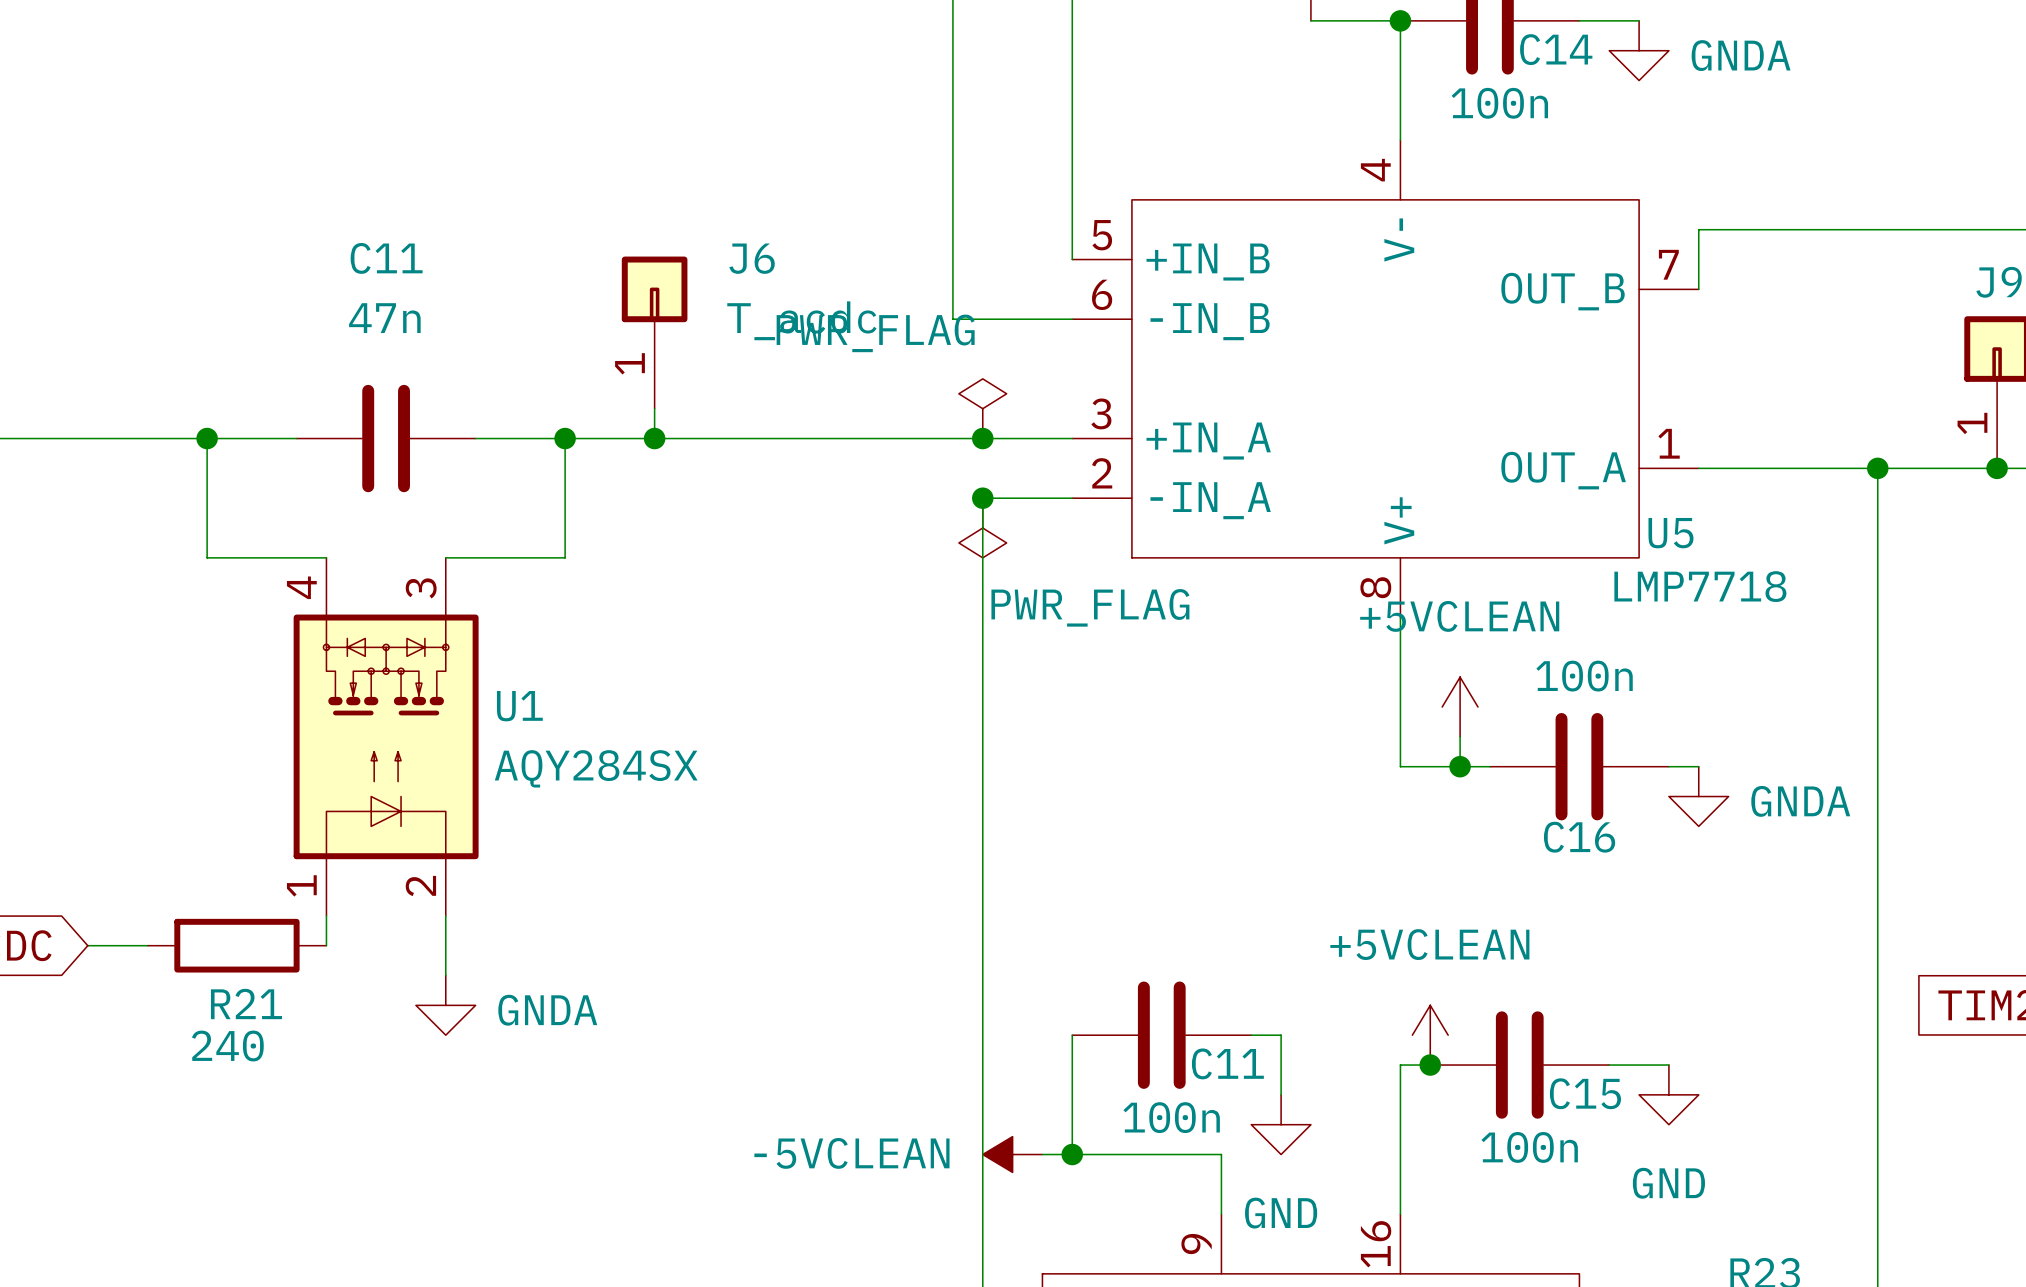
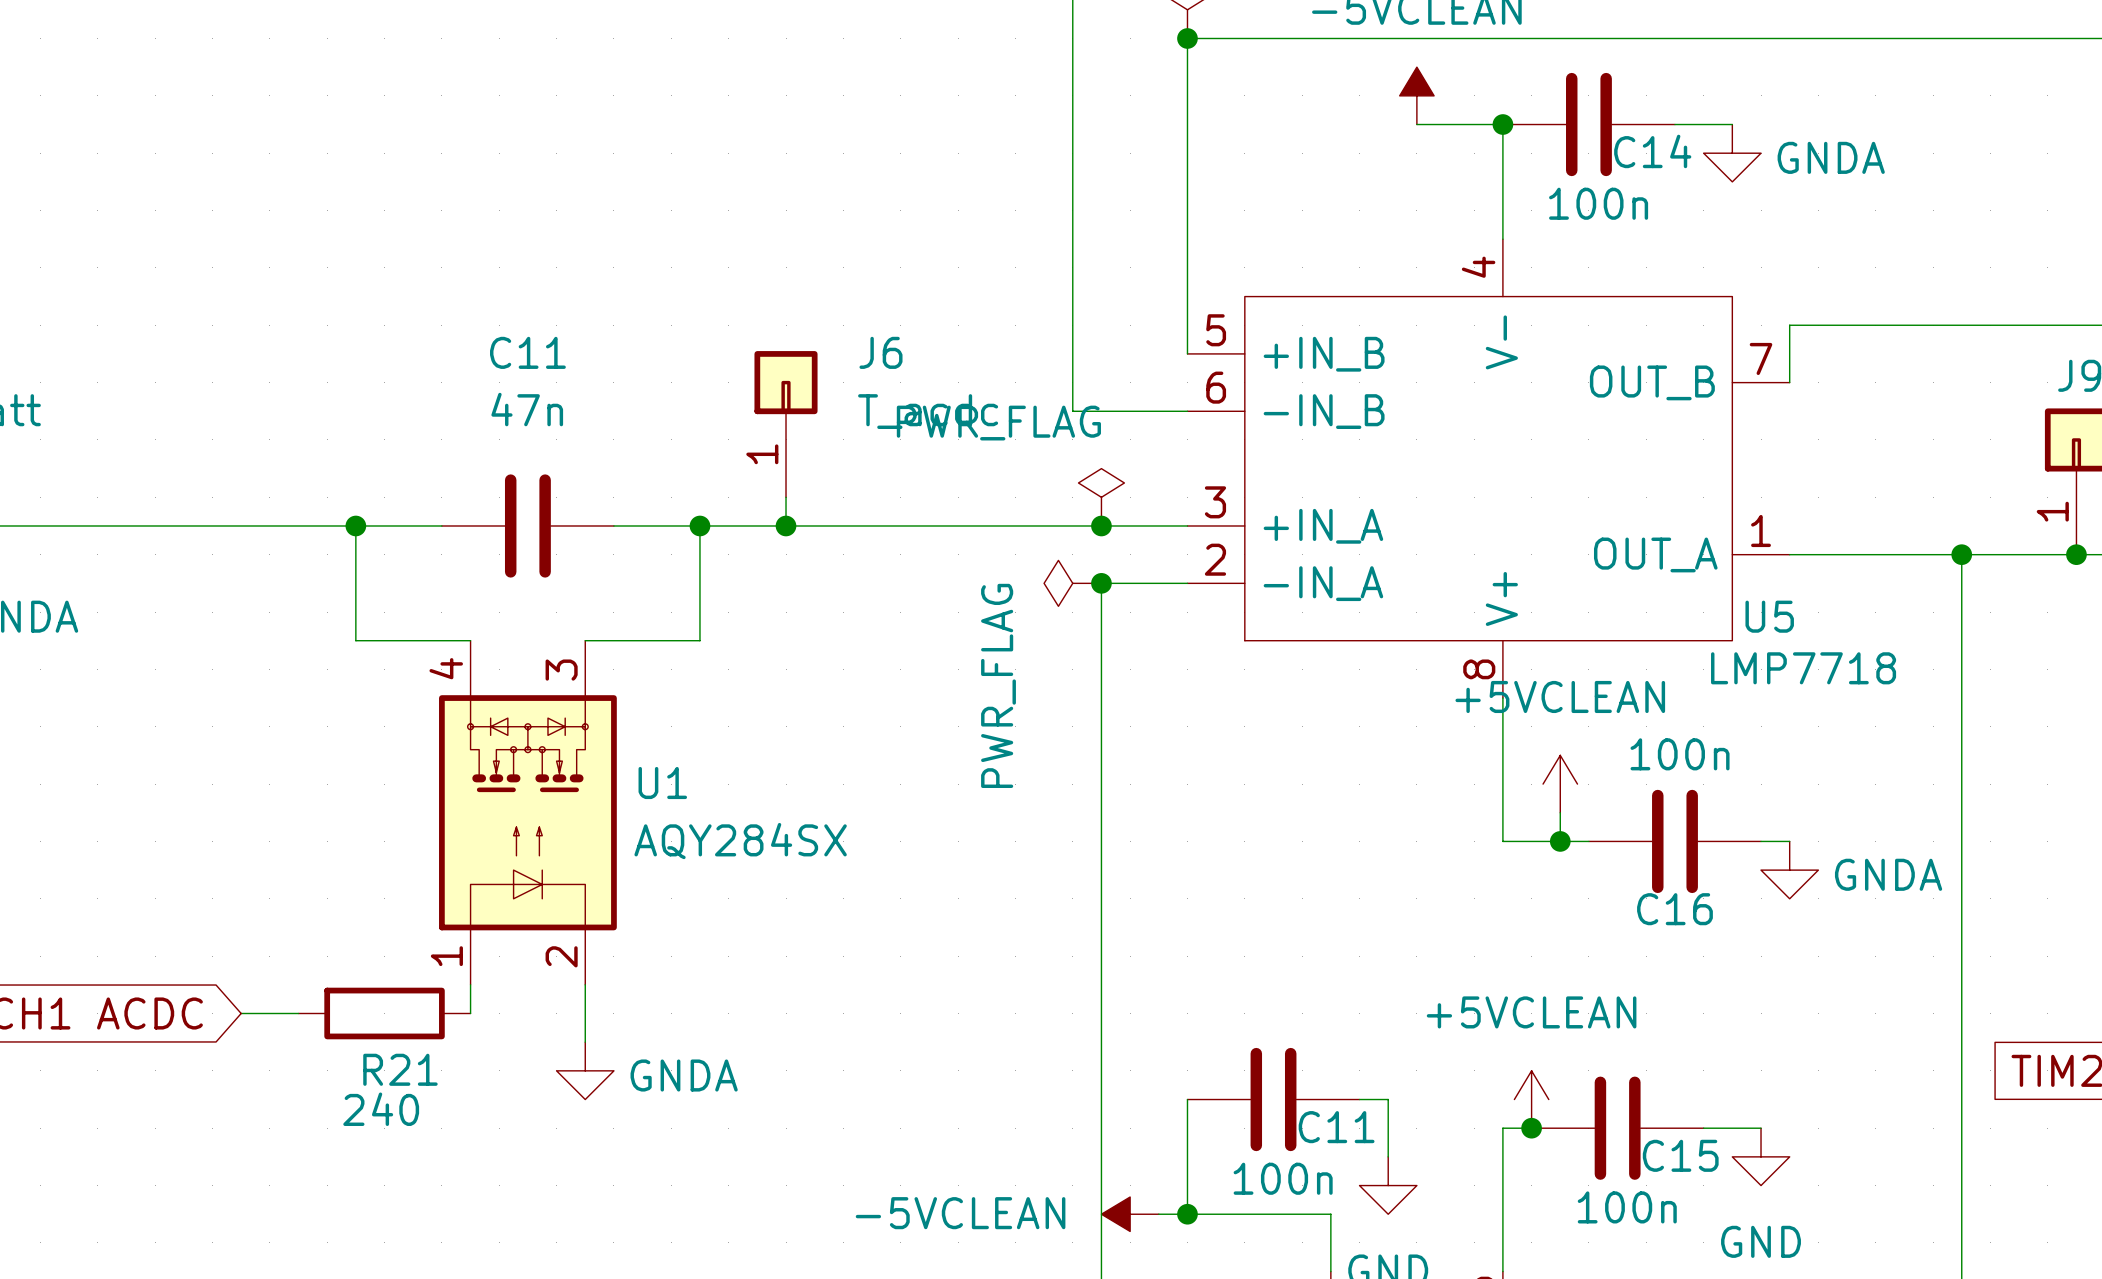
power symbol rotation: 0° (982, 528) -> 90° clockwise (1072, 583)
power symbol position: PWR_FLAG (982, 528) -> PWR_FLAG (1072, 583)

